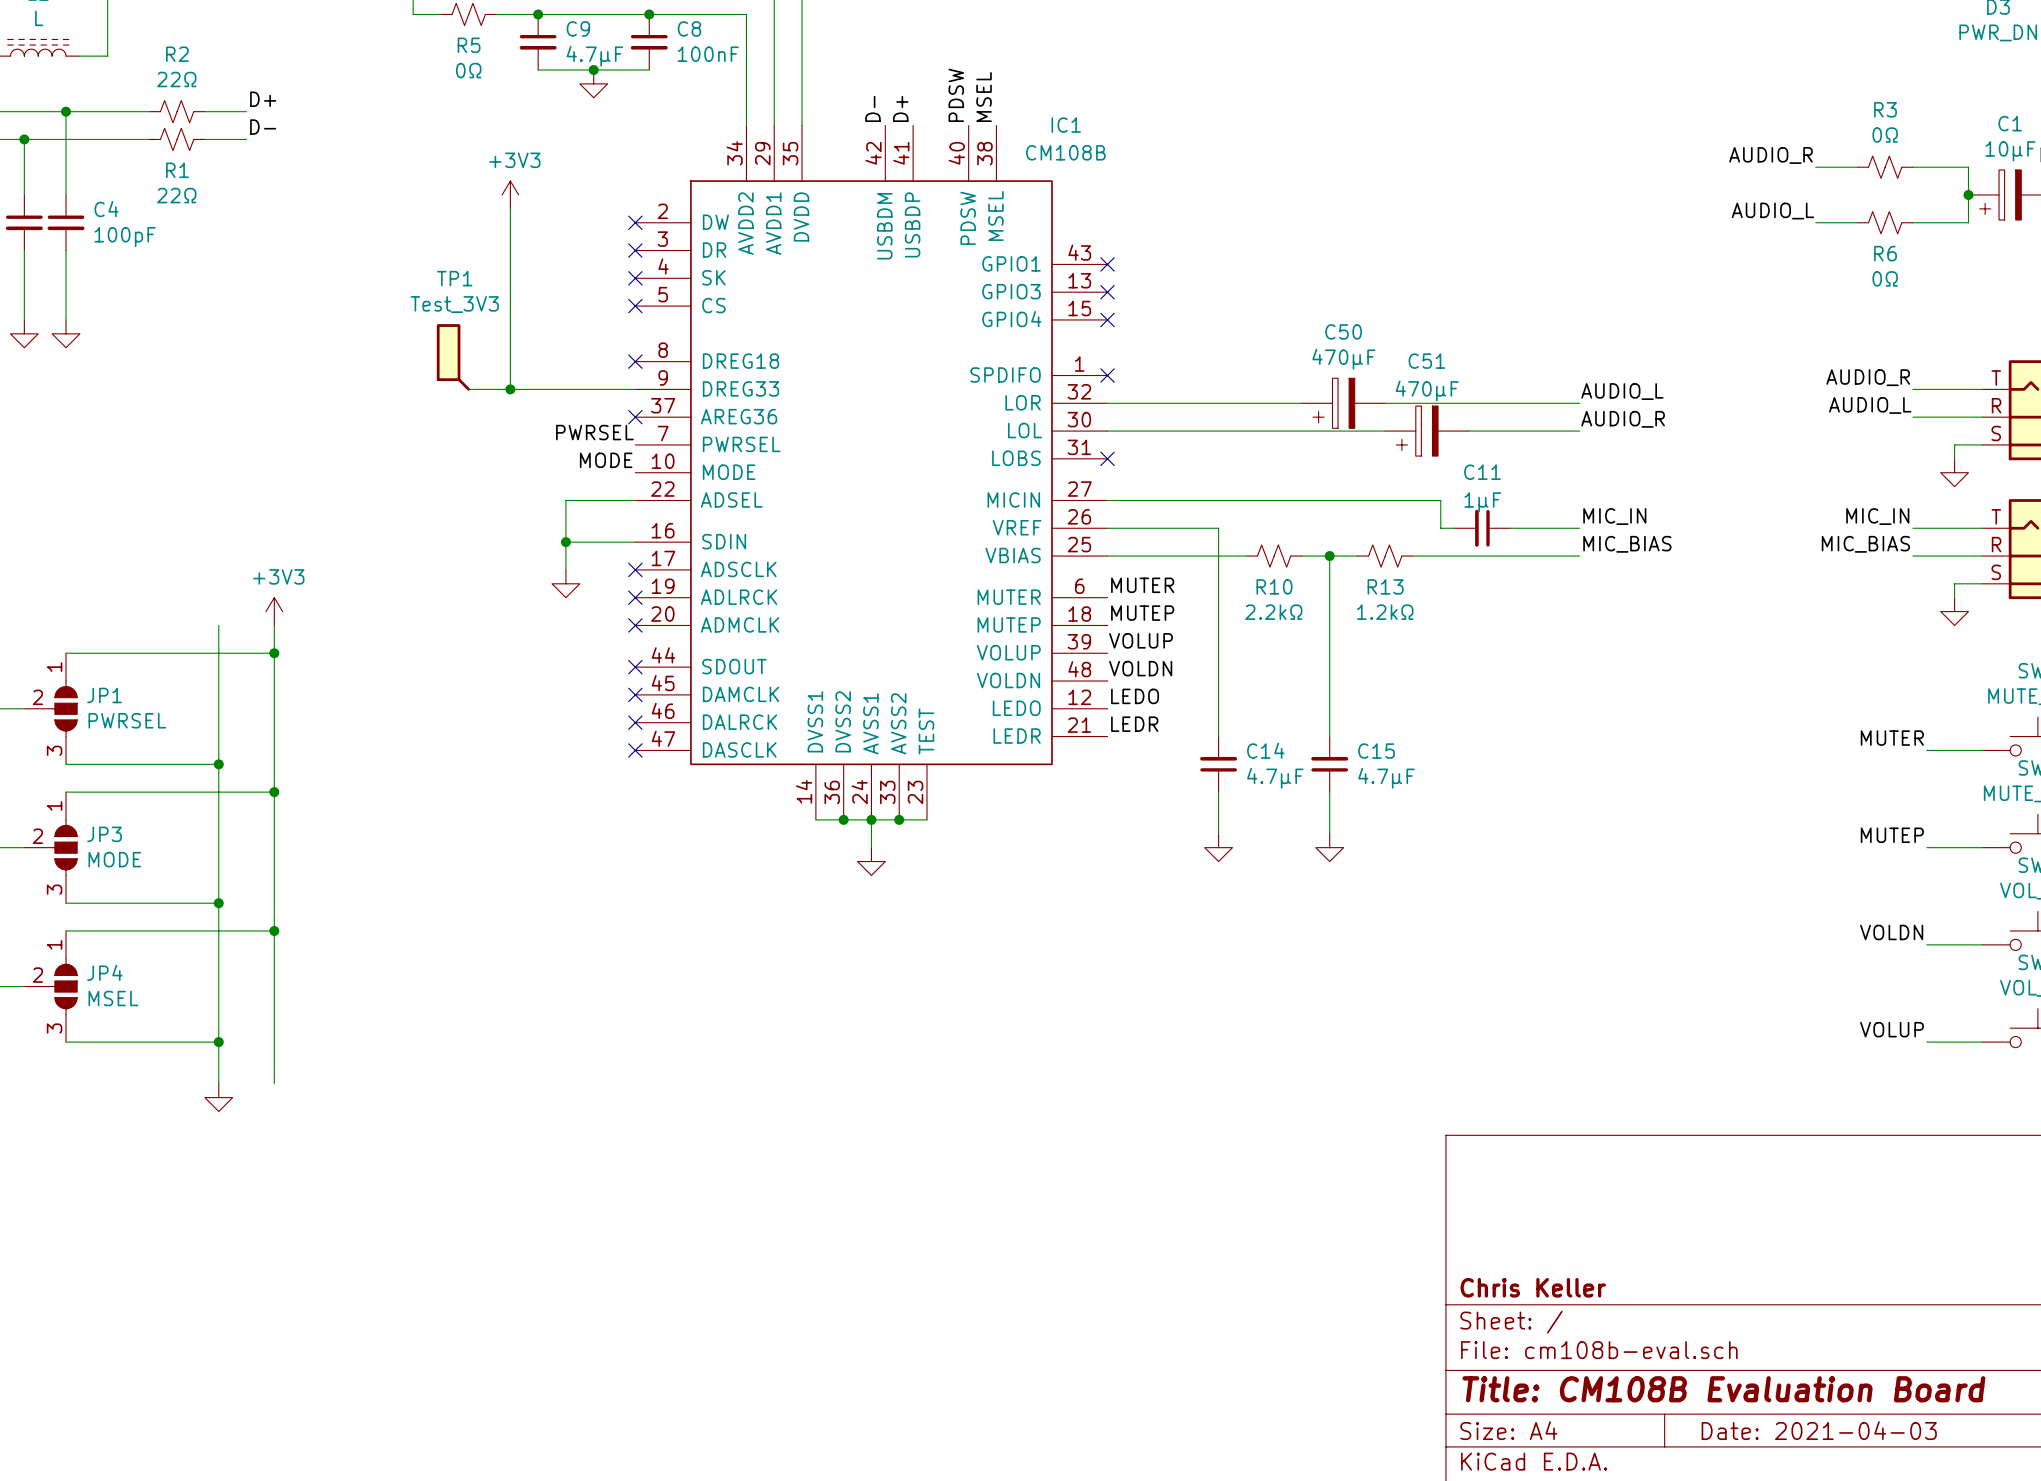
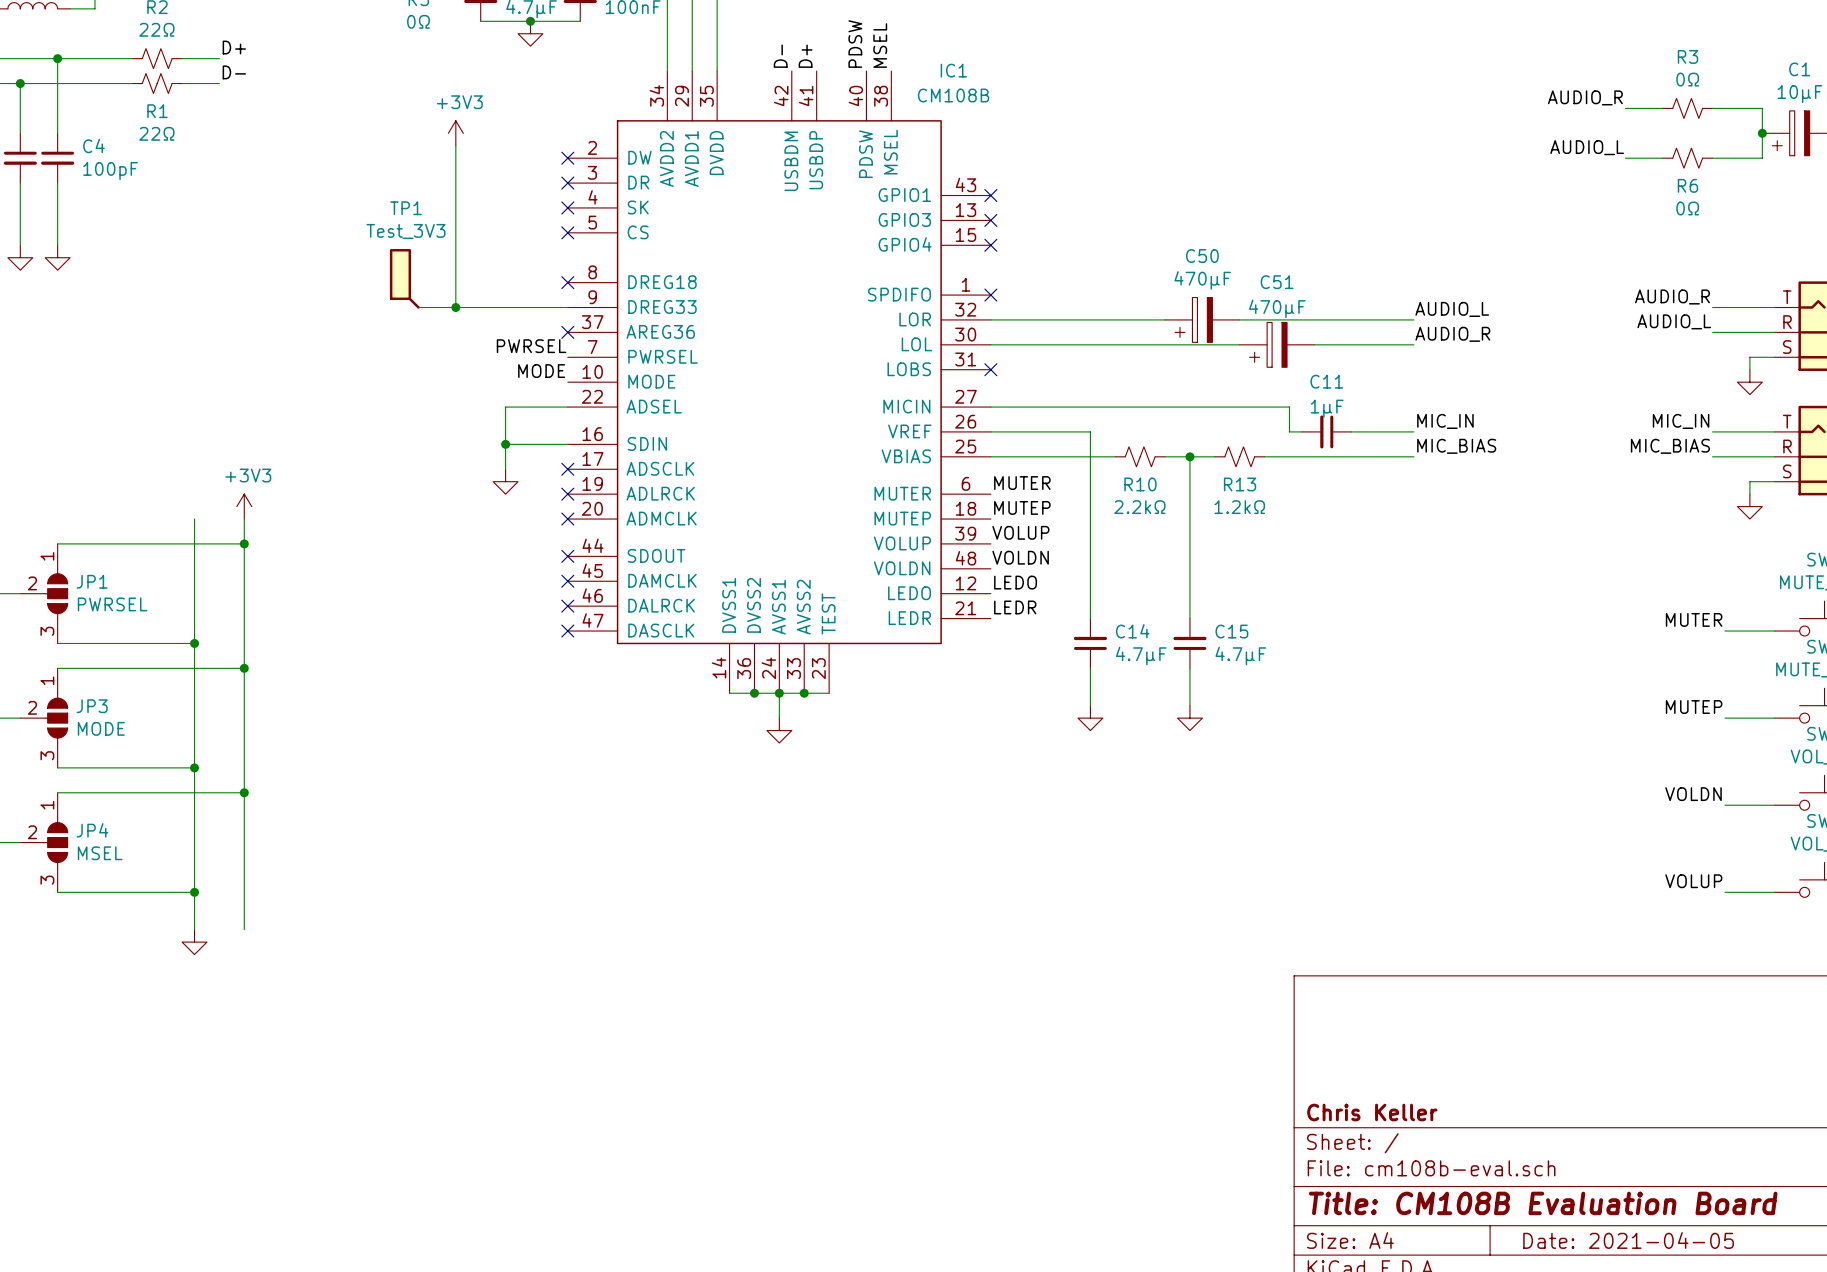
title block: Date: 2021-04-03 (1819, 1430) -> Date: 2021-04-05 (1628, 1240)

